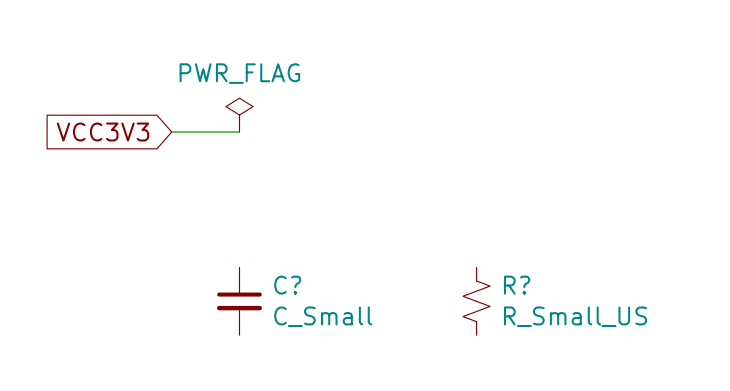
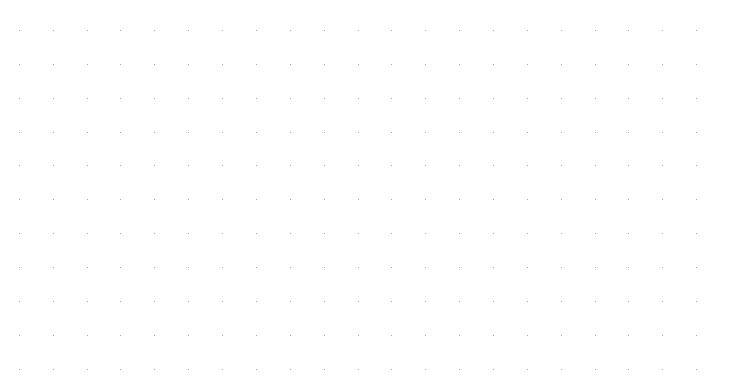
power symbol: PWR_FLAG (239, 115) -> none
global label: VCC3V3 (102, 132) -> none
wire: (171, 132) (239, 132) -> none
C?: C_Small (239, 301) -> none
R?: R_Small_US (476, 301) -> none

